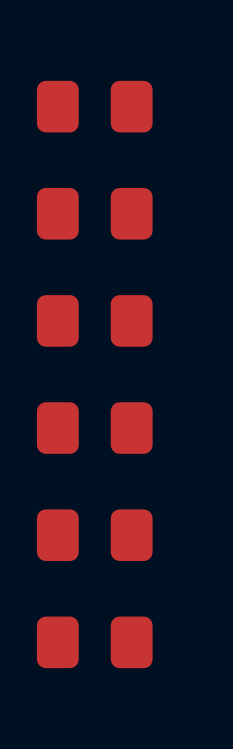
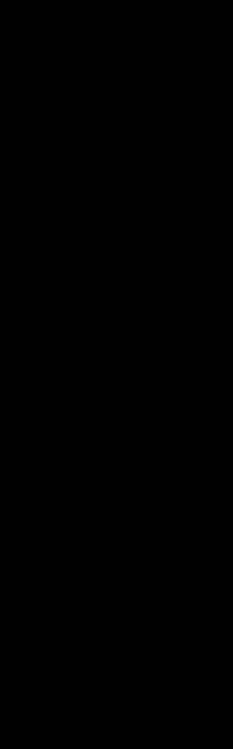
part: (94, 106) -> none
part: (94, 213) -> none
part: (94, 320) -> none
part: (94, 428) -> none
part: (94, 535) -> none
part: (94, 642) -> none

